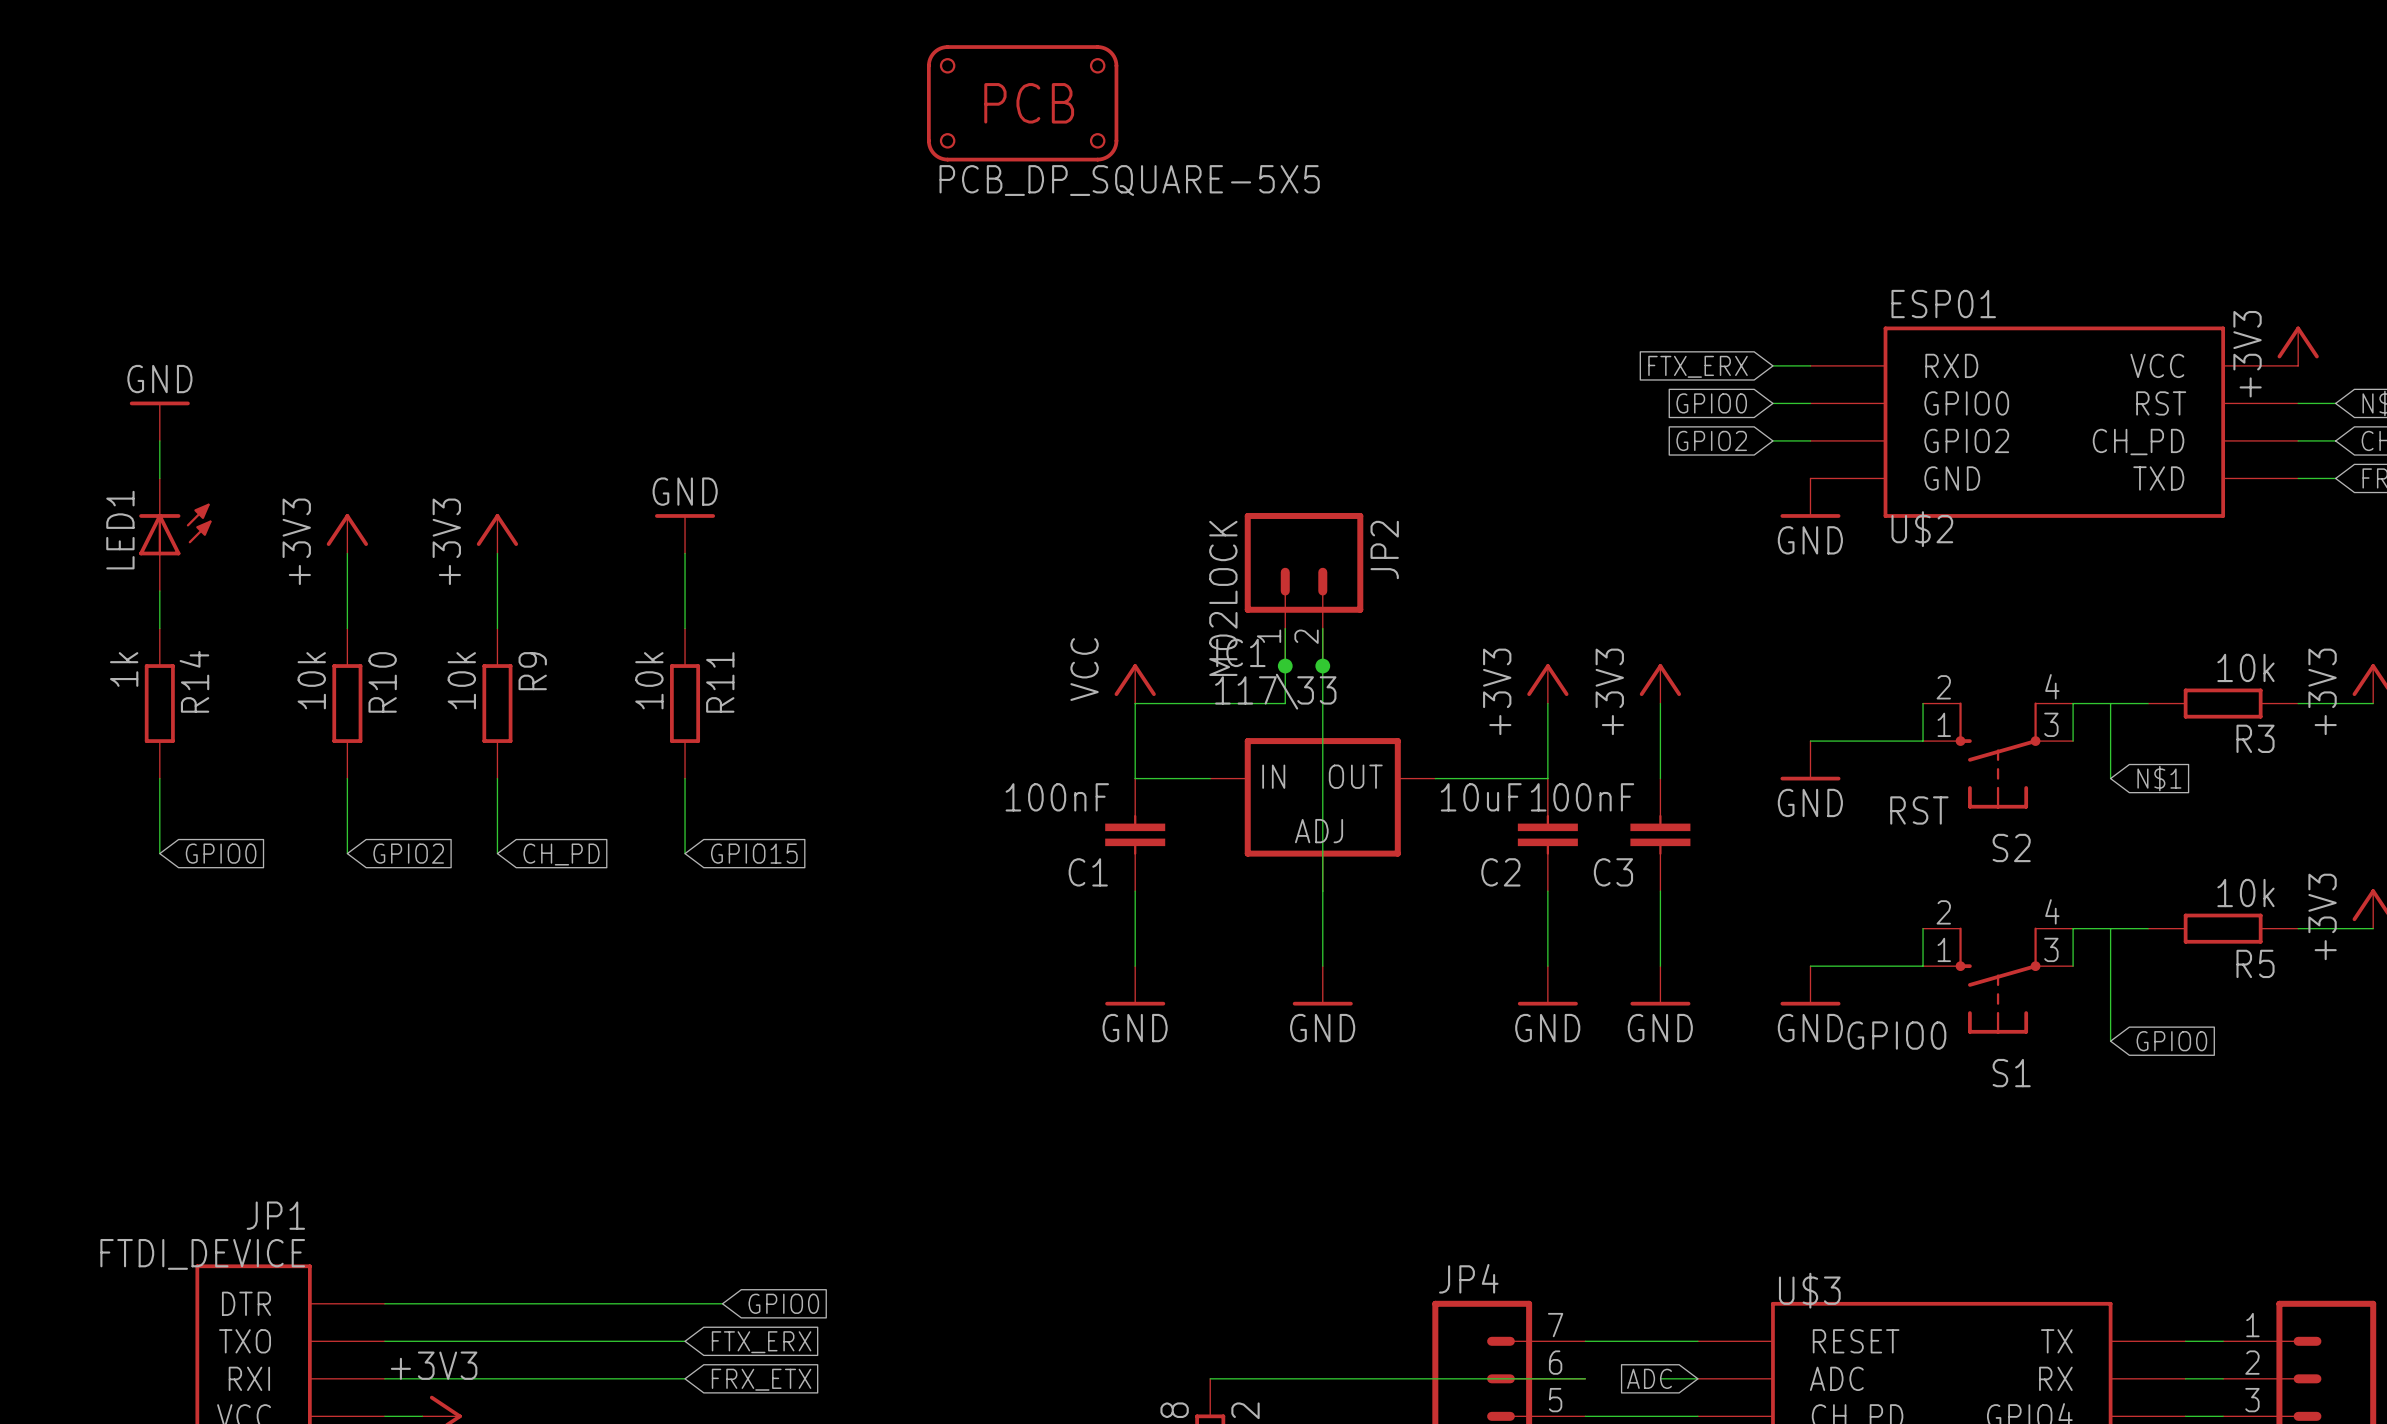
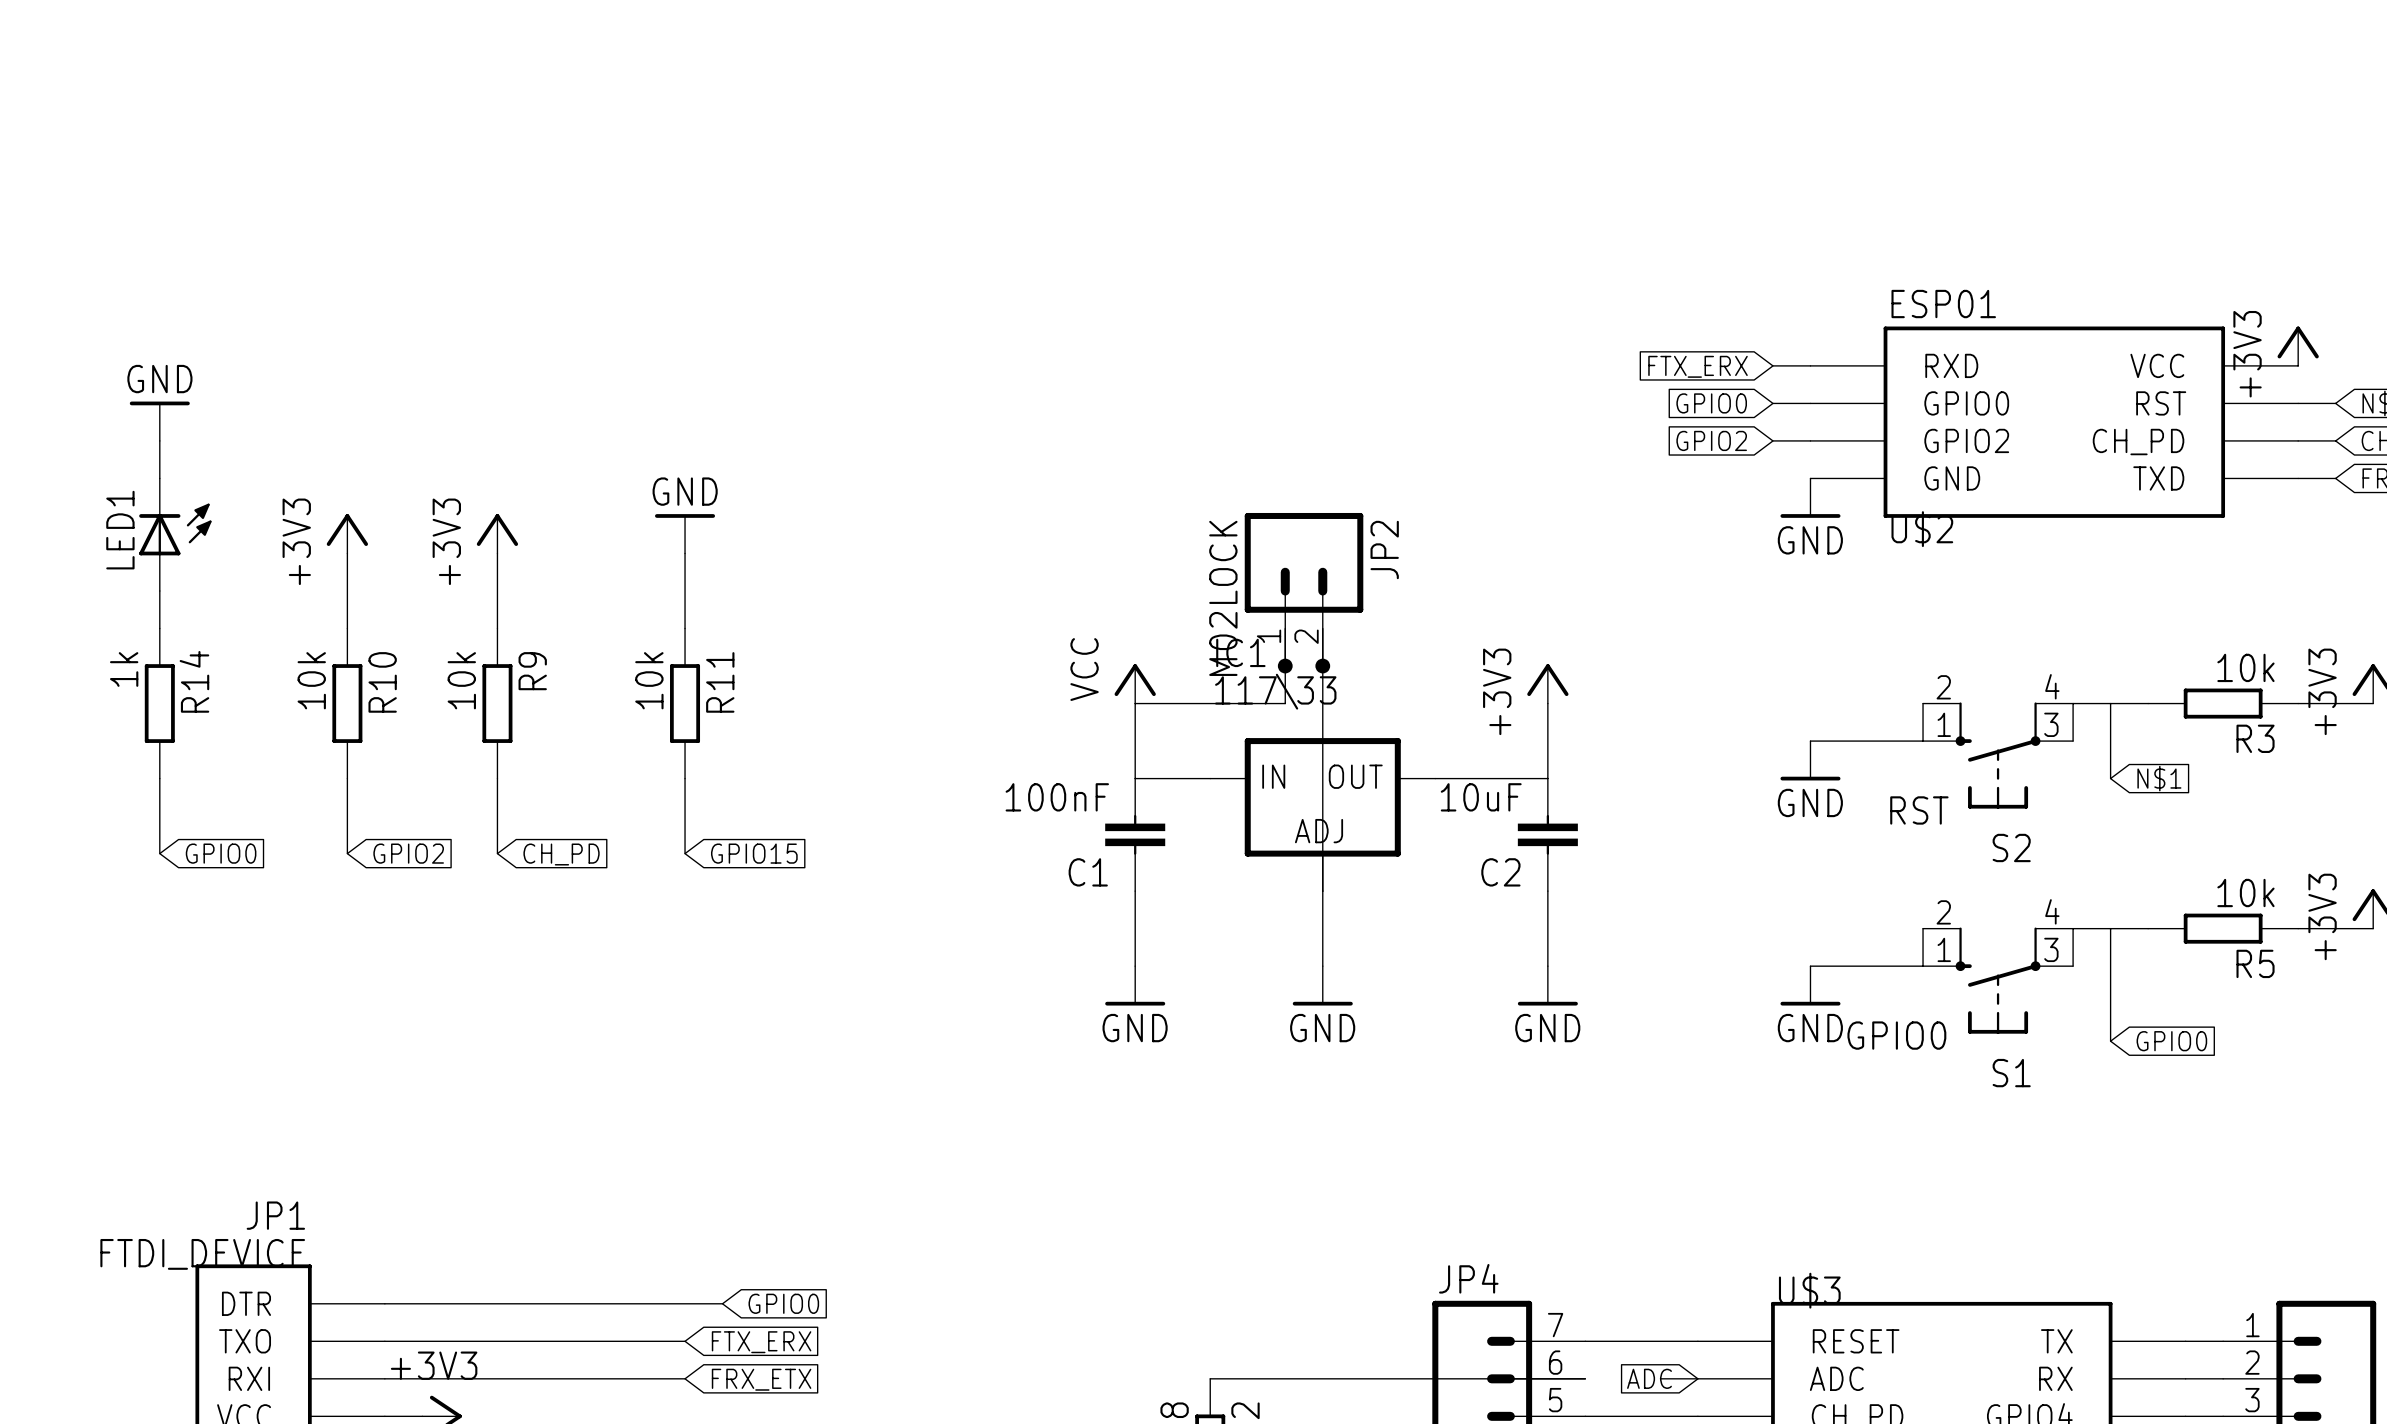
part: PCB_DP_SQUARE-5X5 (1022, 103) -> none
power symbol: +3V3 (1660, 683) -> none
wire: (1660, 703) (1660, 778) -> none
C3: 100nF (1660, 834) -> none
wire: (1660, 891) (1660, 966) -> none
power symbol: GND (1660, 985) -> none

